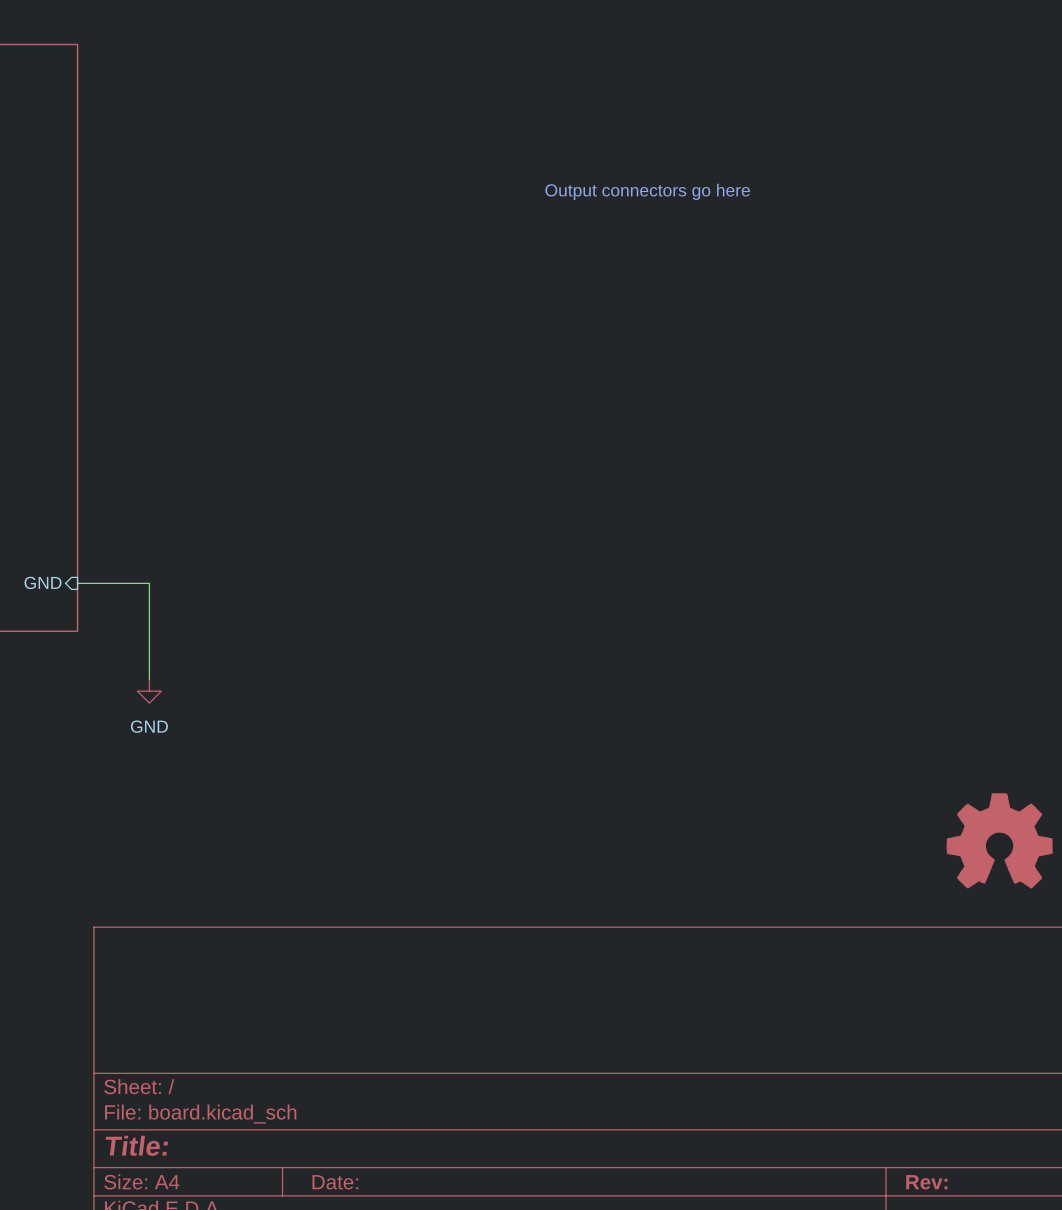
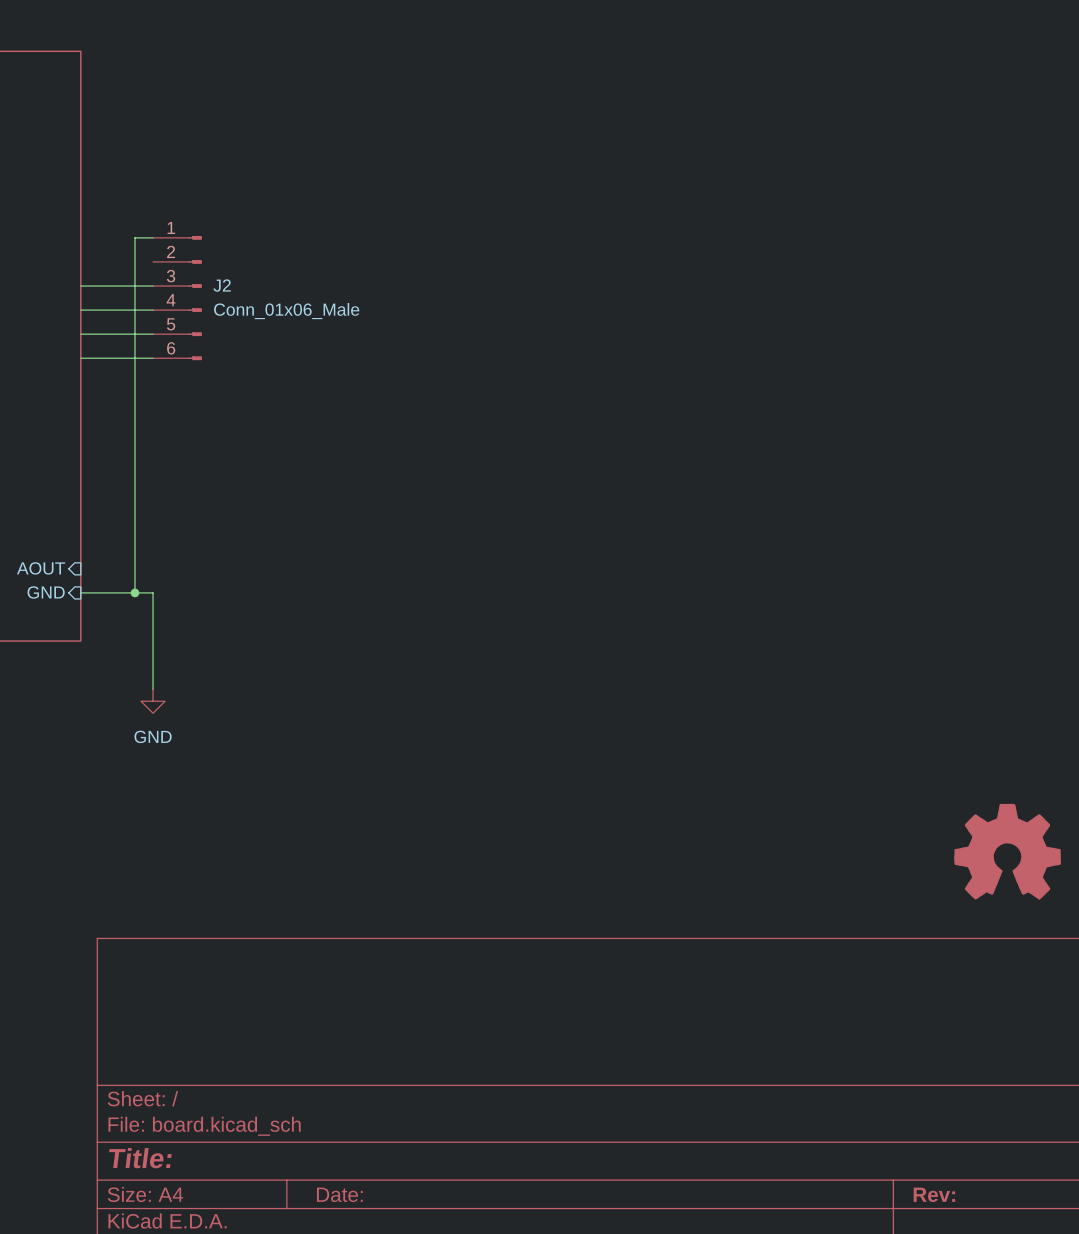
text: Output connectors go here (647, 191) -> none
wire: none -> (153, 237) (134, 237) (134, 592)
wire: none -> (80, 286) (153, 286)
J2: none -> Conn_01x06_Male (177, 298)
wire: none -> (80, 310) (153, 310)
wire: none -> (80, 334) (153, 334)
wire: none -> (80, 358) (153, 358)
sheet pin: none -> AOUT (41, 568)
junction: none -> (134, 592)

